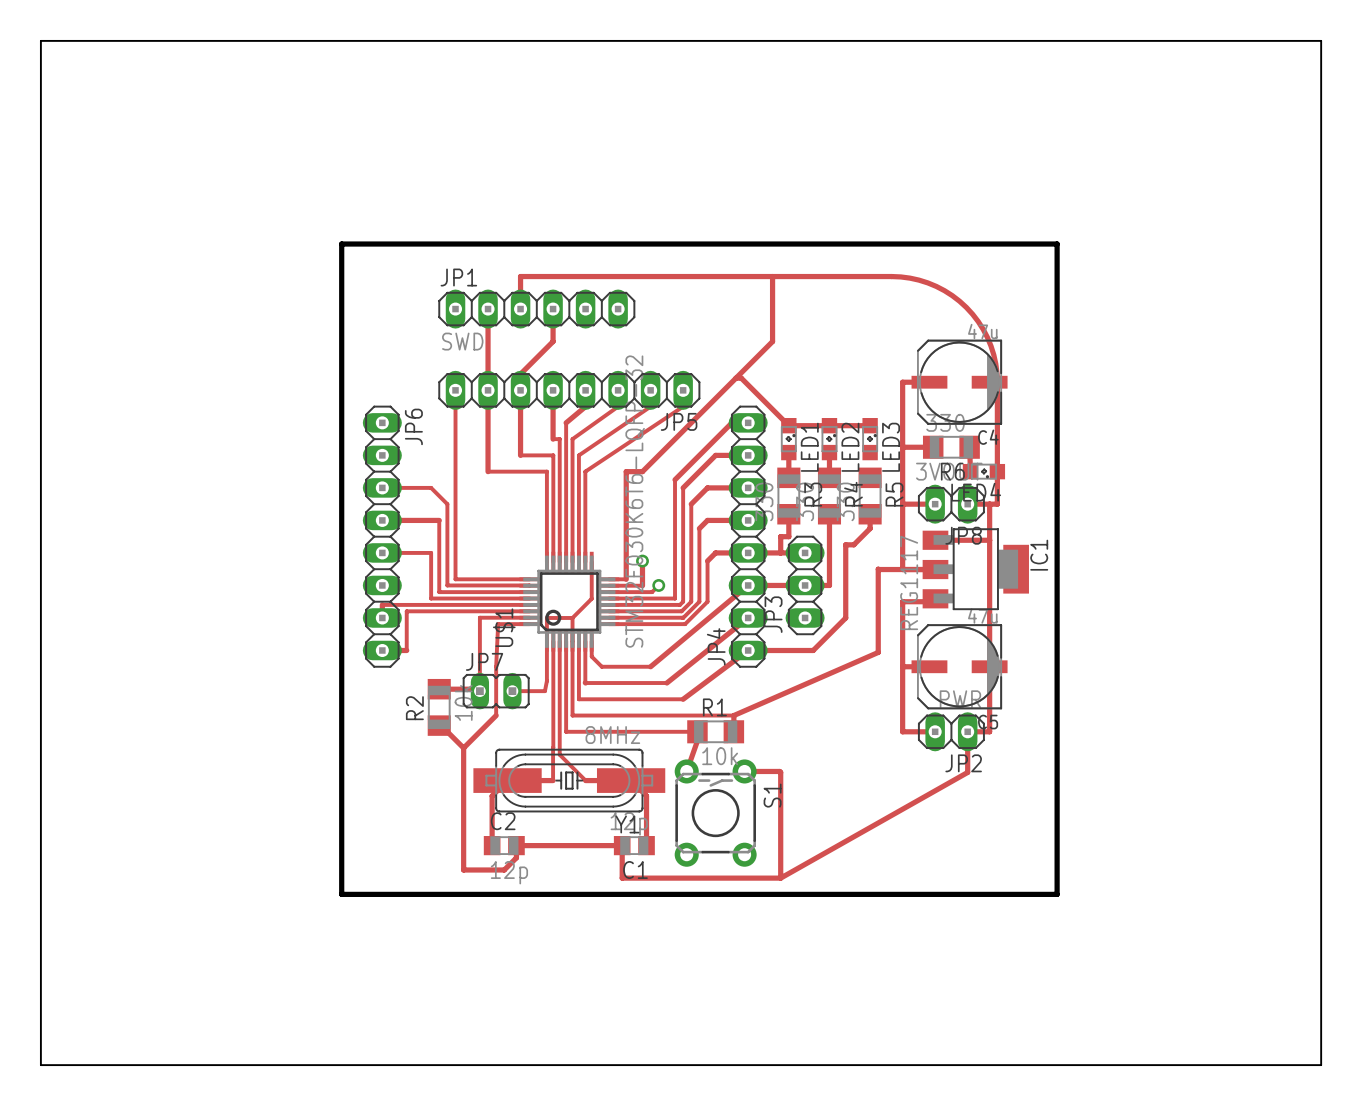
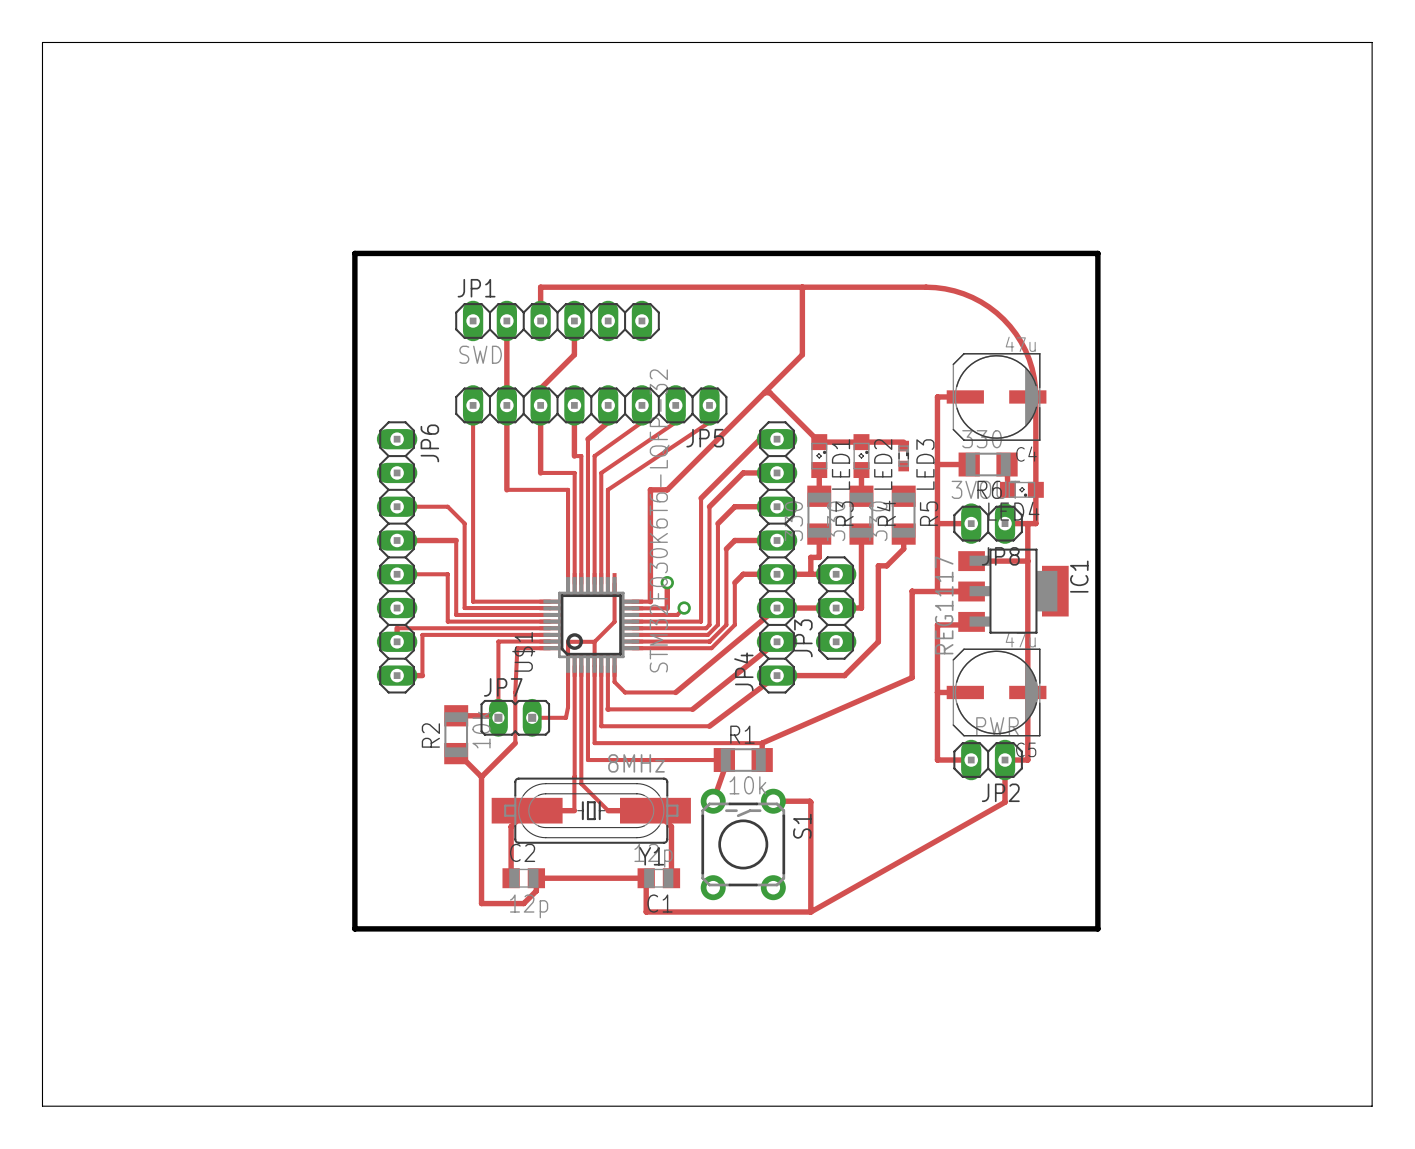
LED3 footprint: [862, 418, 878, 461] -> [898, 440, 910, 472]

